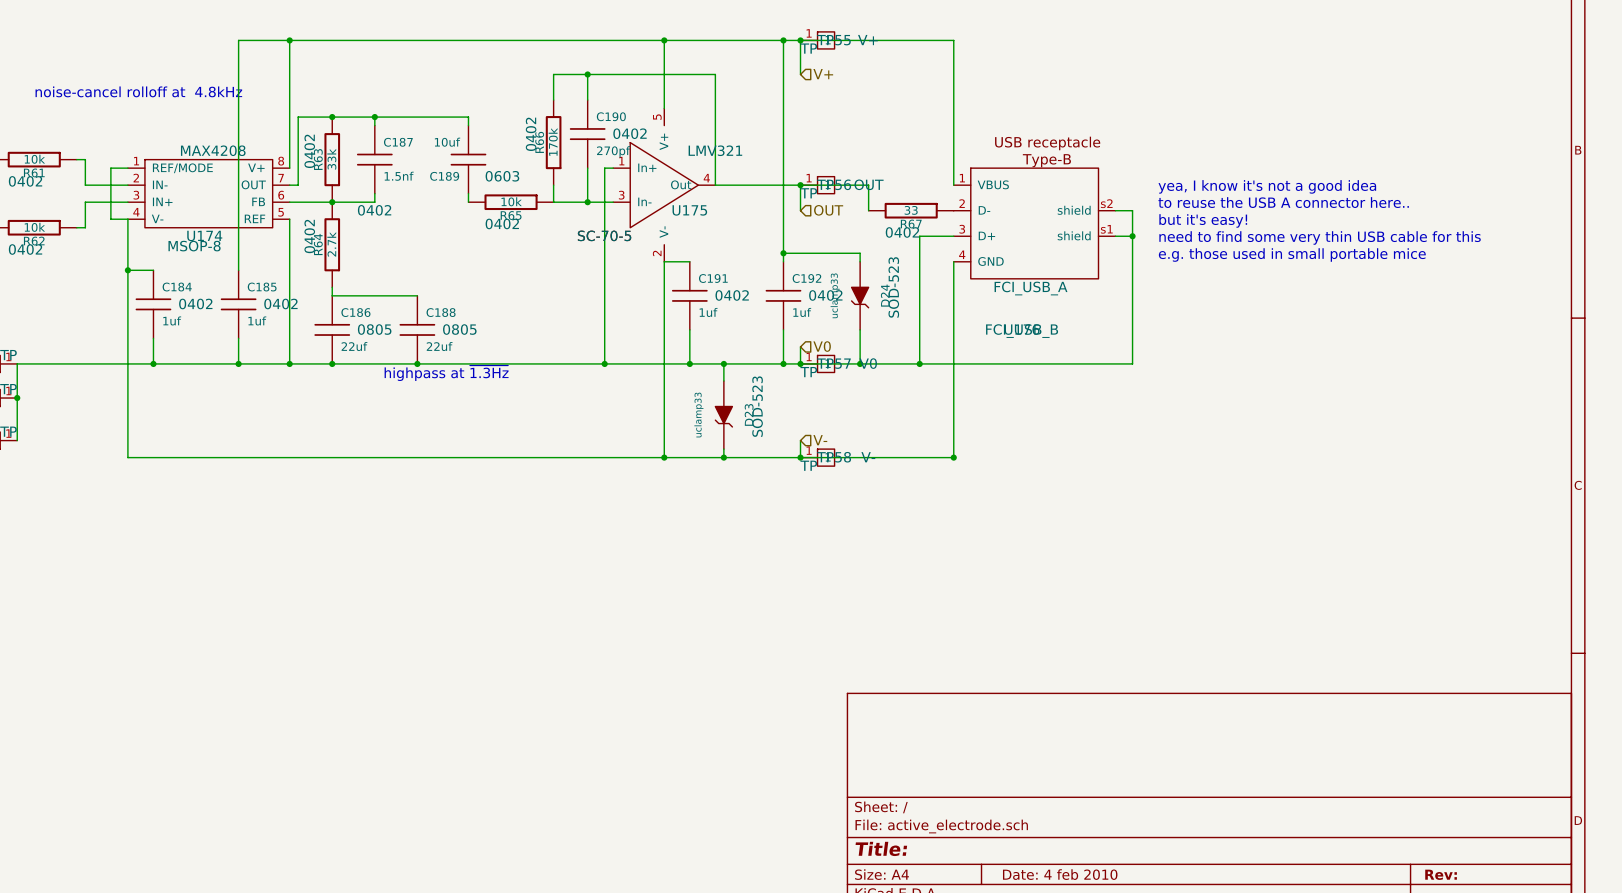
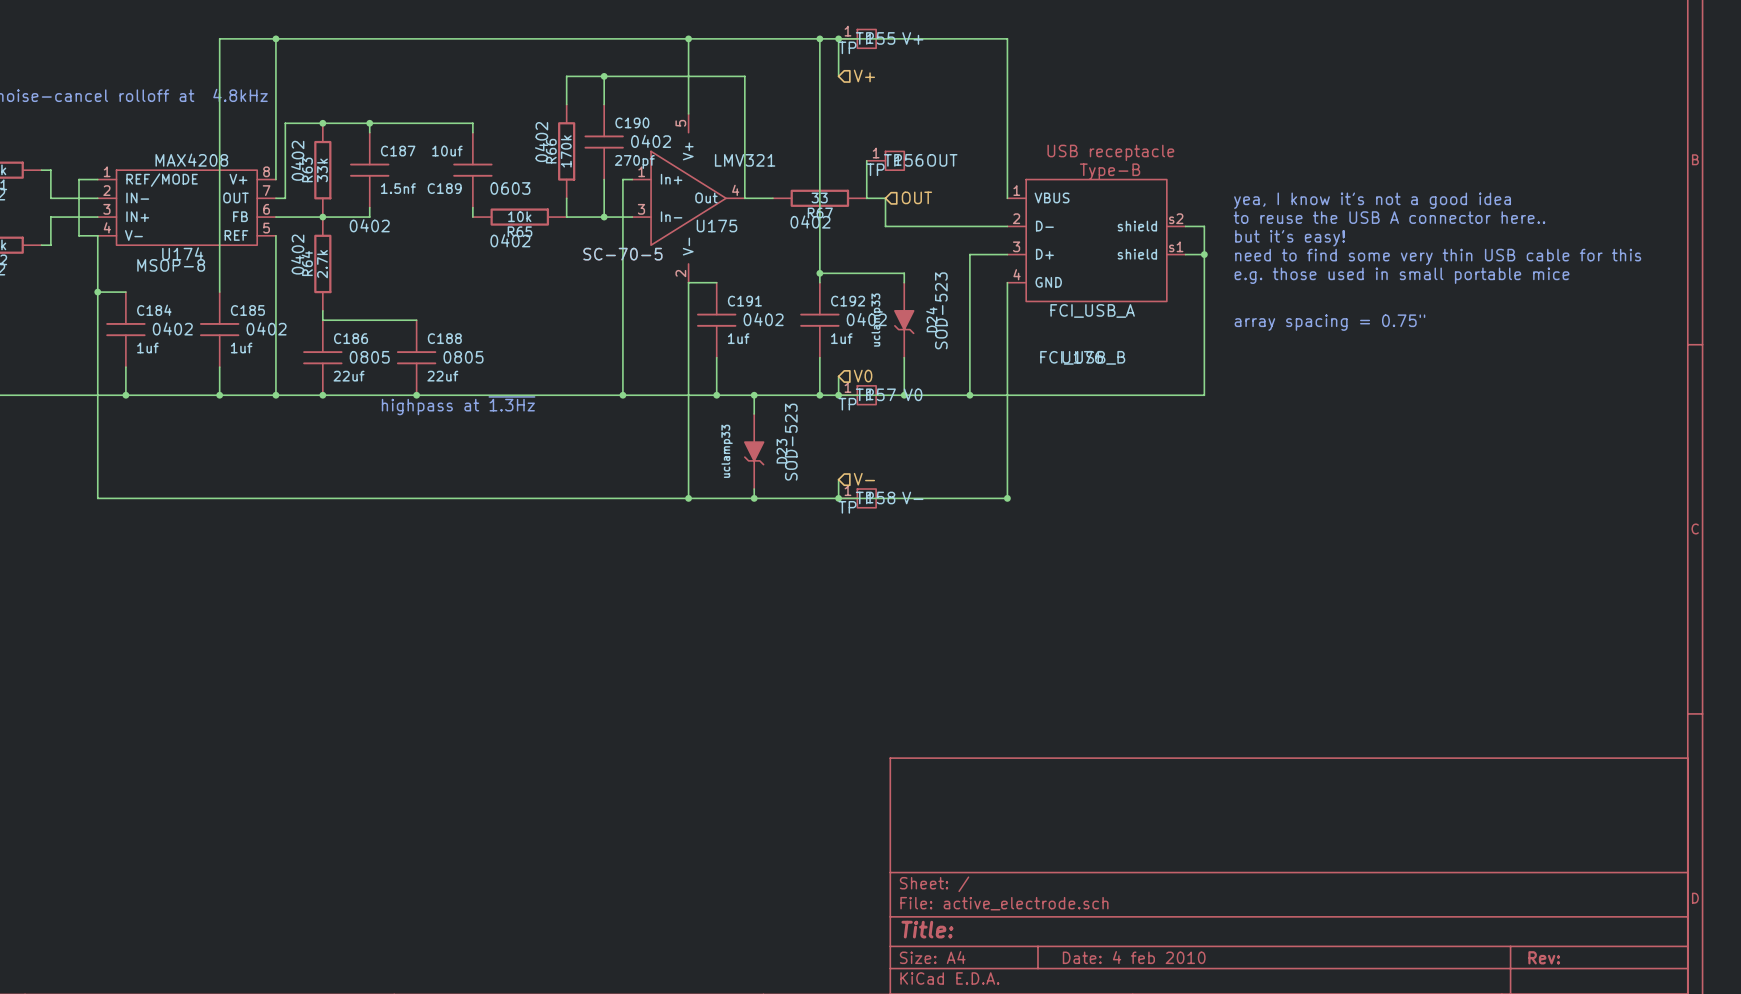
wire: (740, 185) (826, 185) -> (866, 160) (866, 198)
wire: (800, 185) (800, 210) -> none
junction: (800, 185) -> none
TP56 position: (817, 185) -> (885, 160)
wire: (843, 185) (868, 185) (868, 210) -> (885, 198) (885, 226) (1007, 226)
hierarchical label position: OUT (828, 210) -> OUT (916, 197)
R67 position: (911, 210) -> (819, 198)
text: none -> array spacing = 0.75" (1329, 322)

